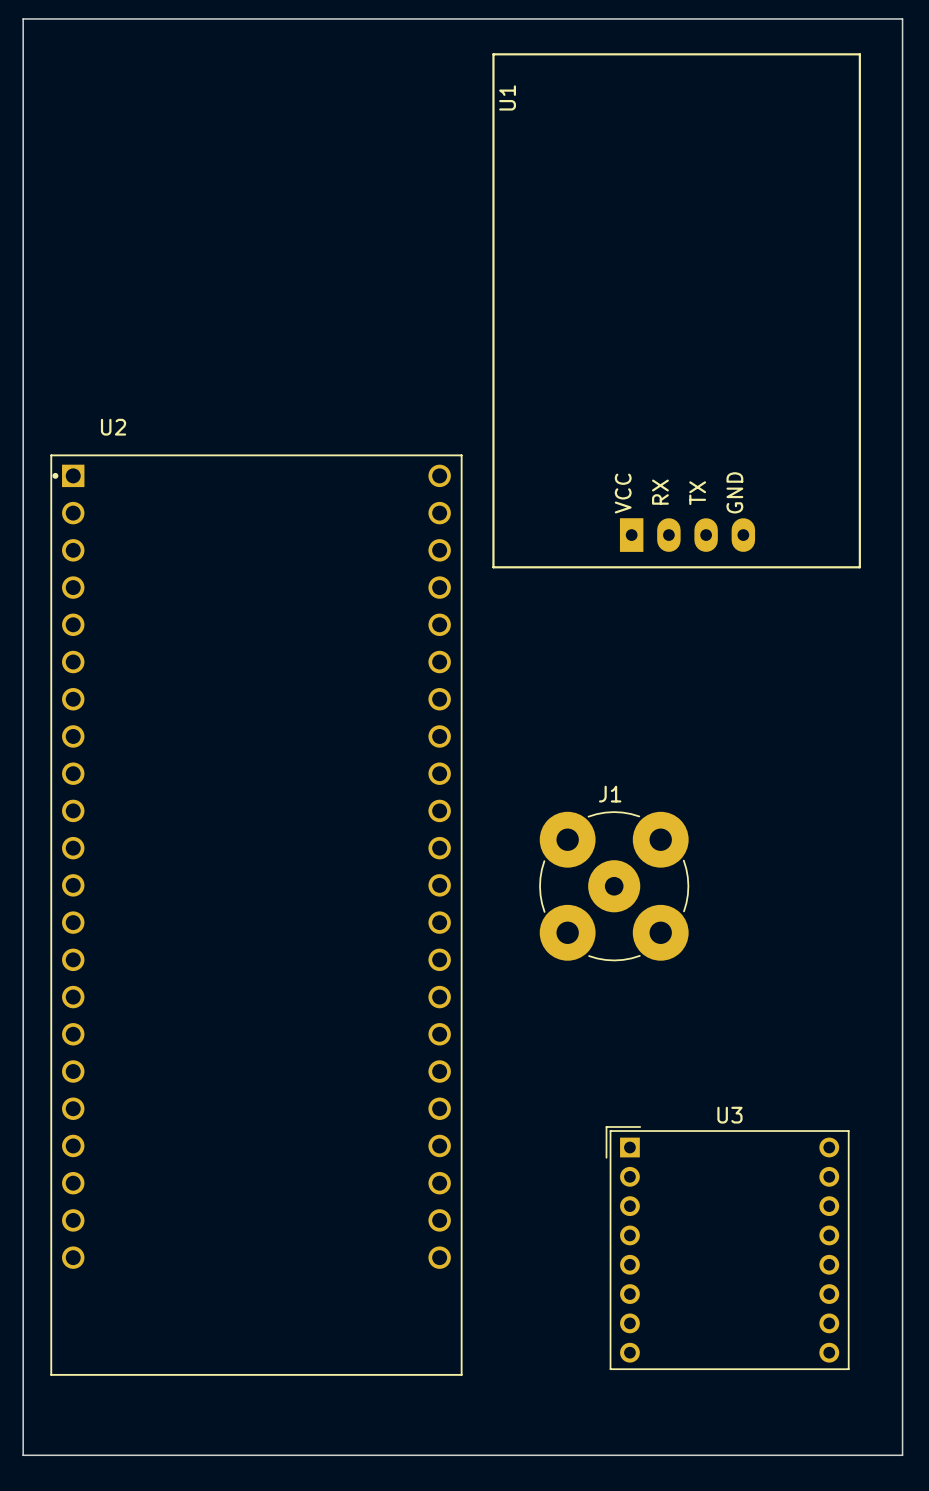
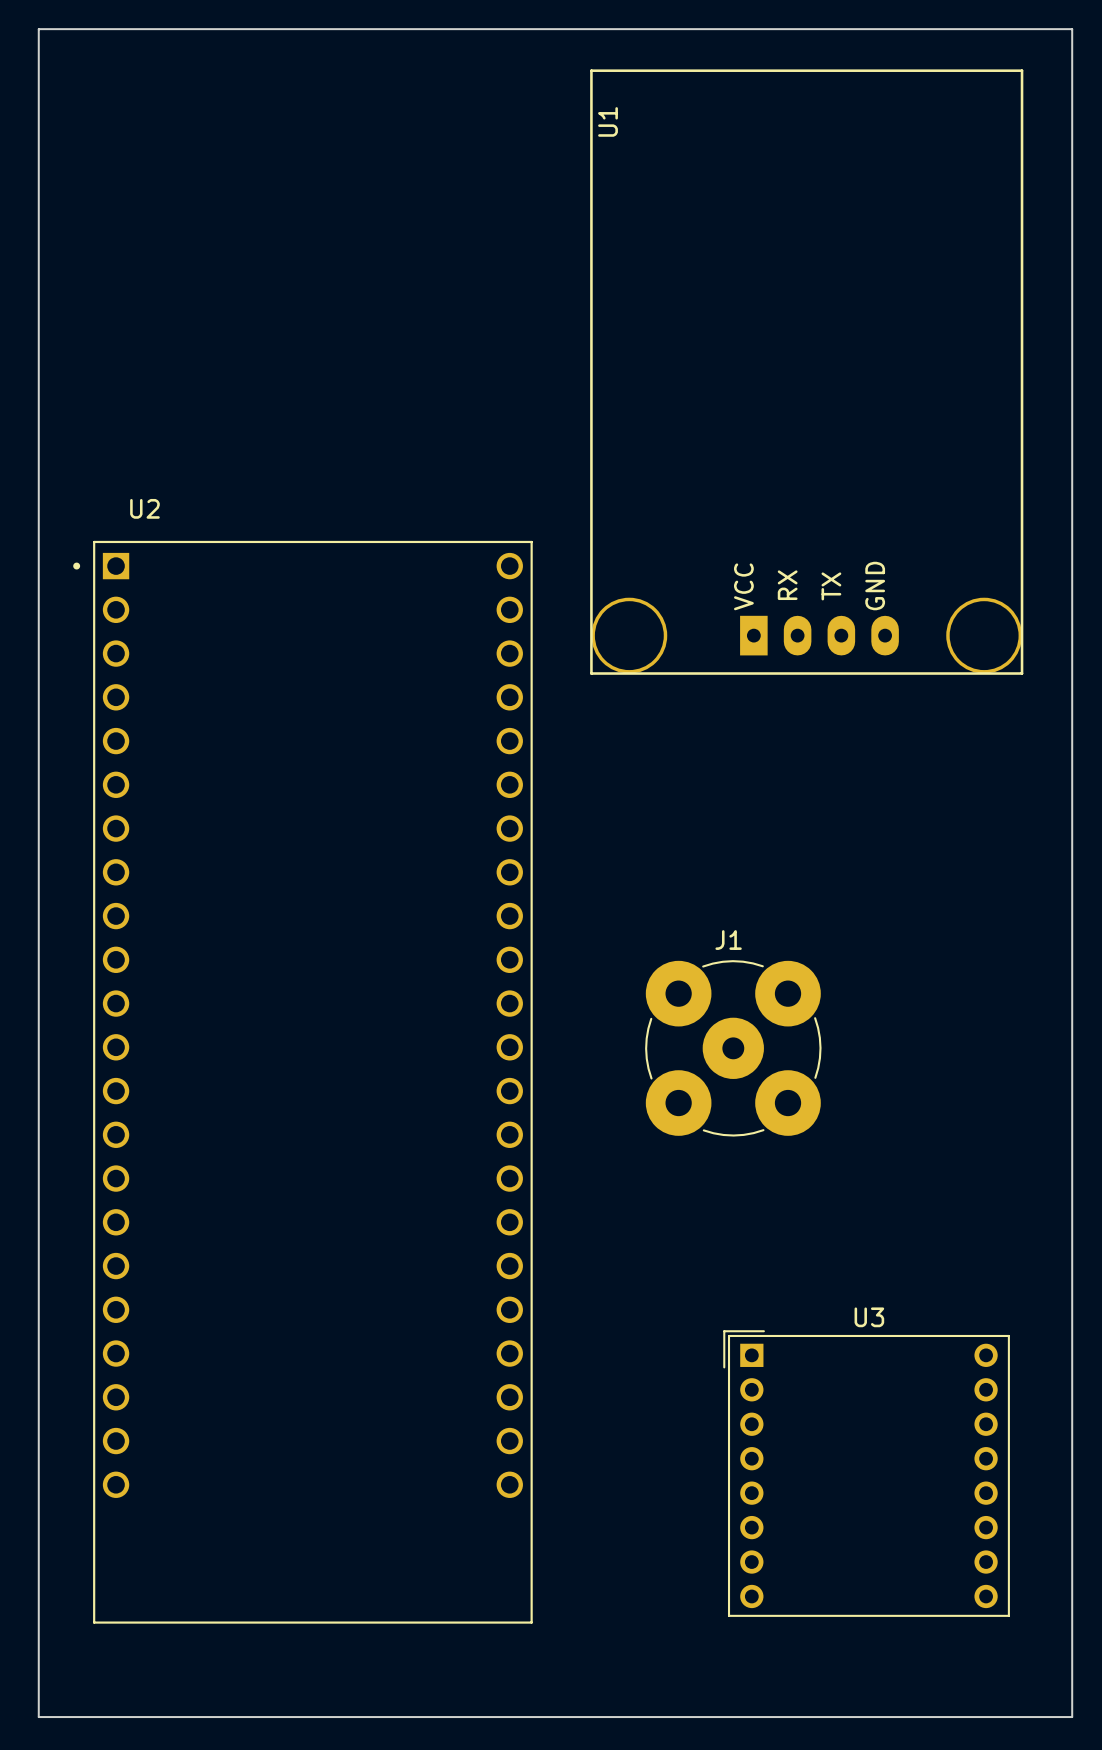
U1 footprint: [492, 53, 861, 569] -> [590, 69, 1024, 675]
U2 footprint: [50, 454, 463, 1376] -> [73, 540, 533, 1624]

